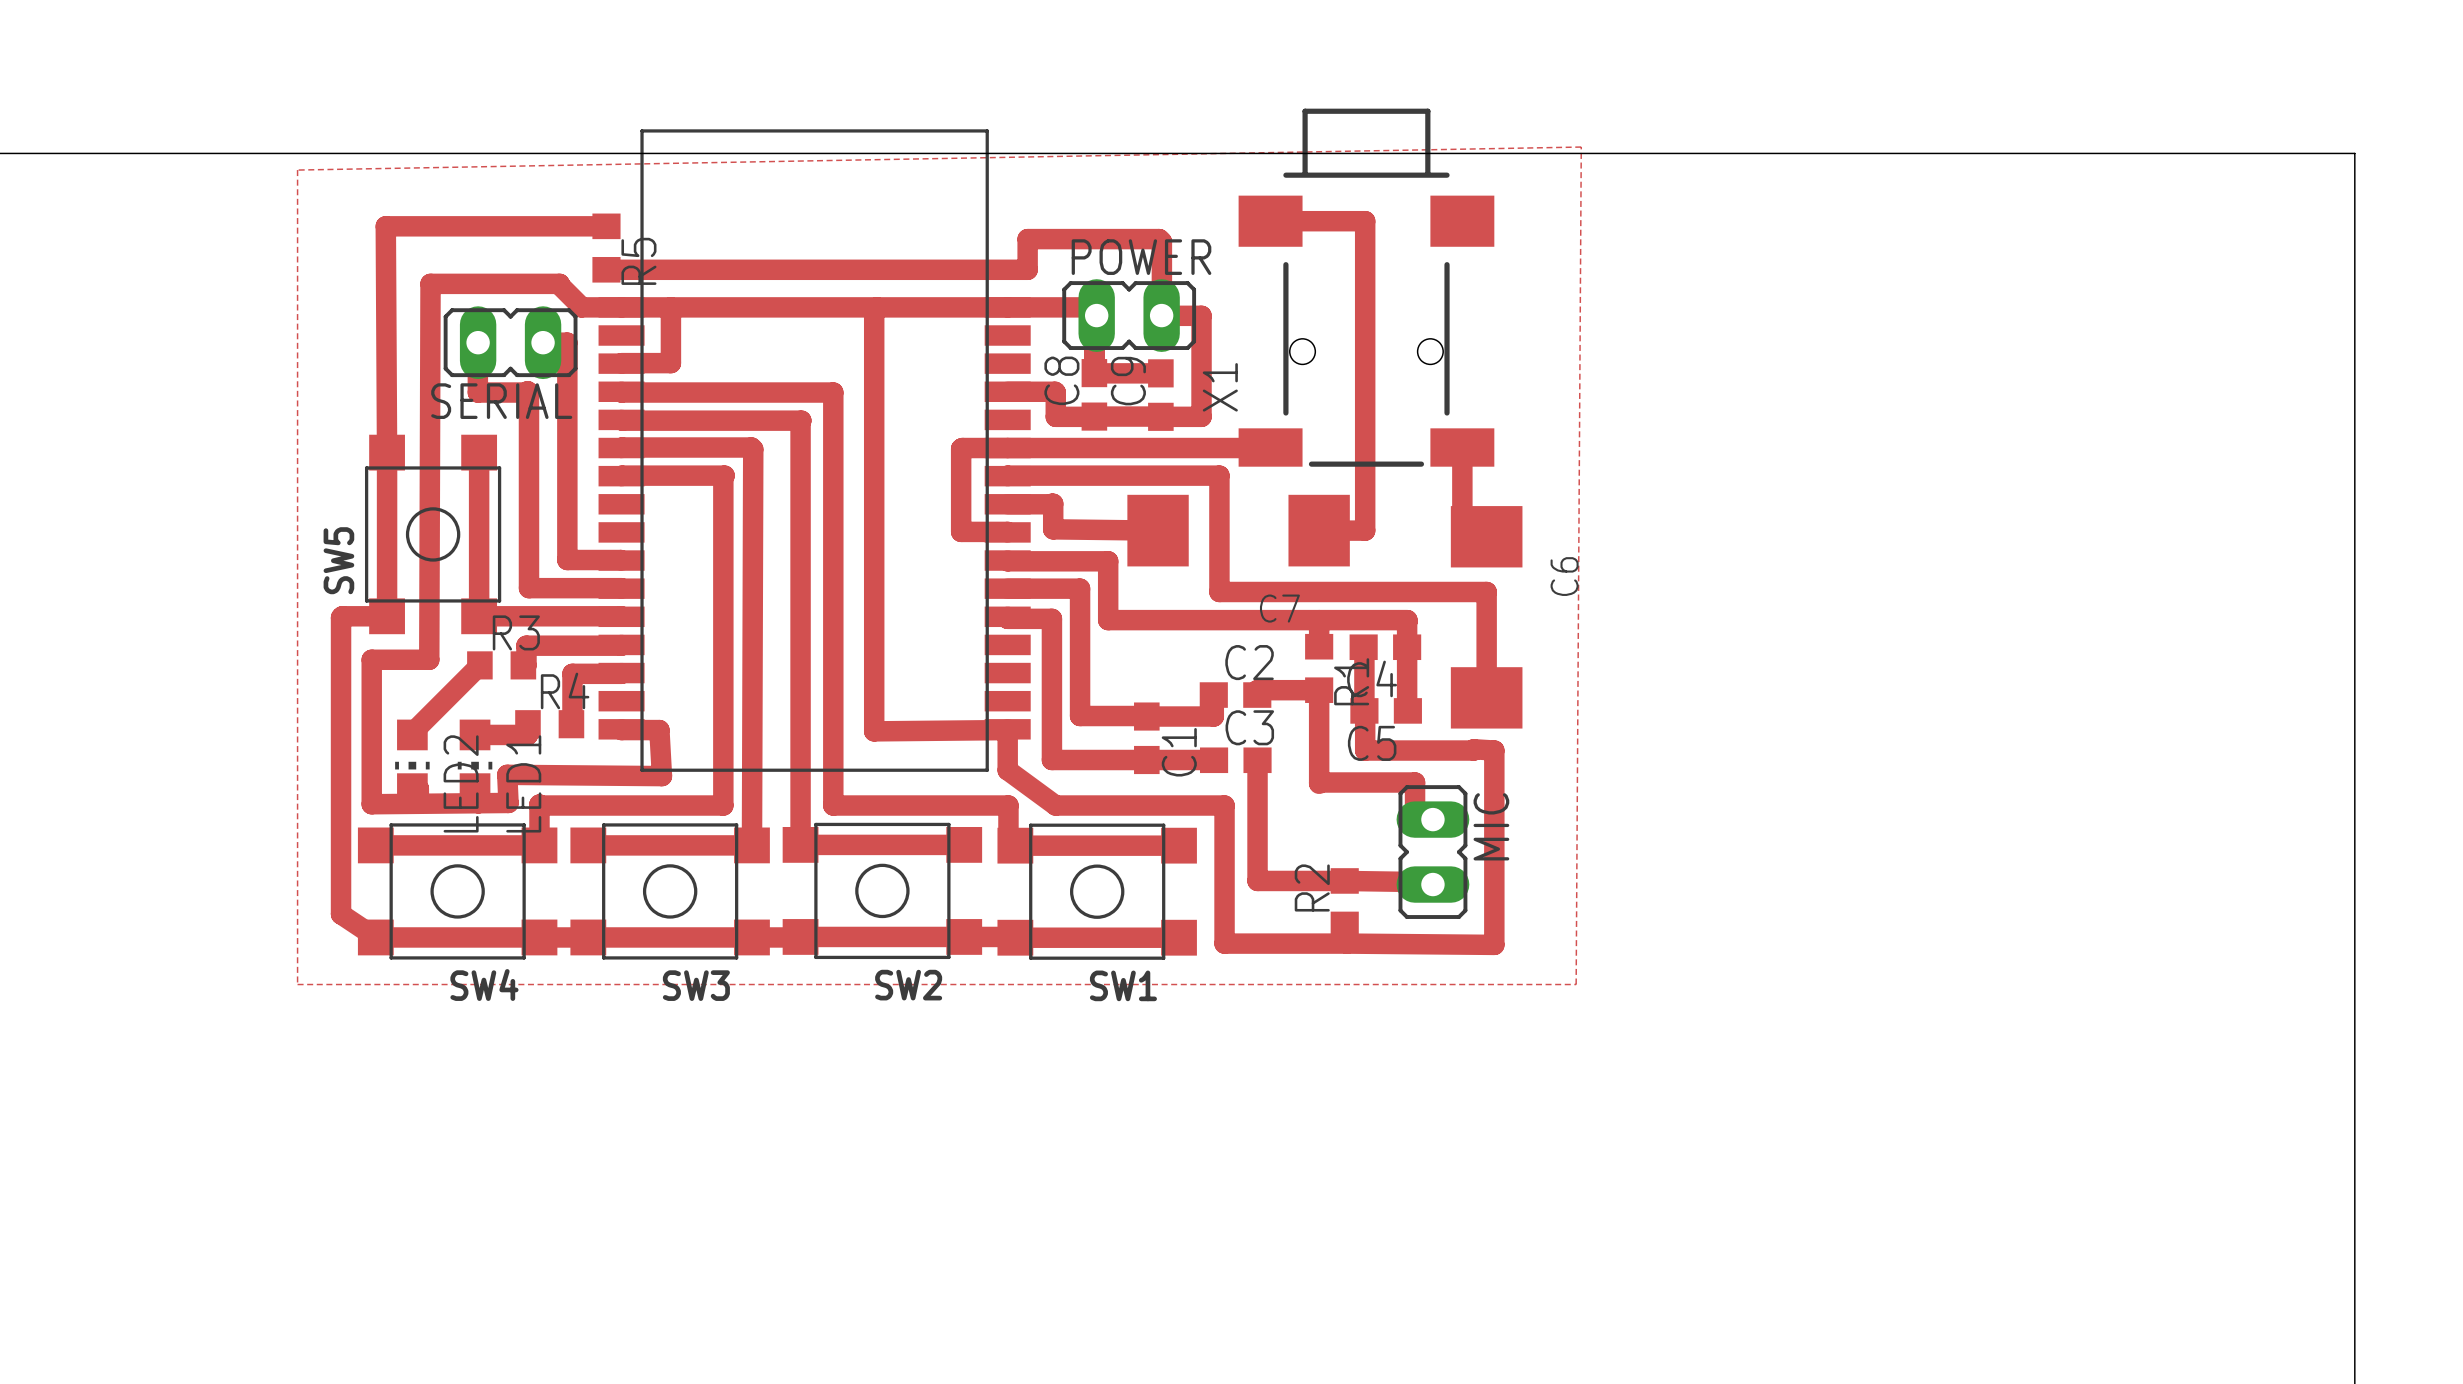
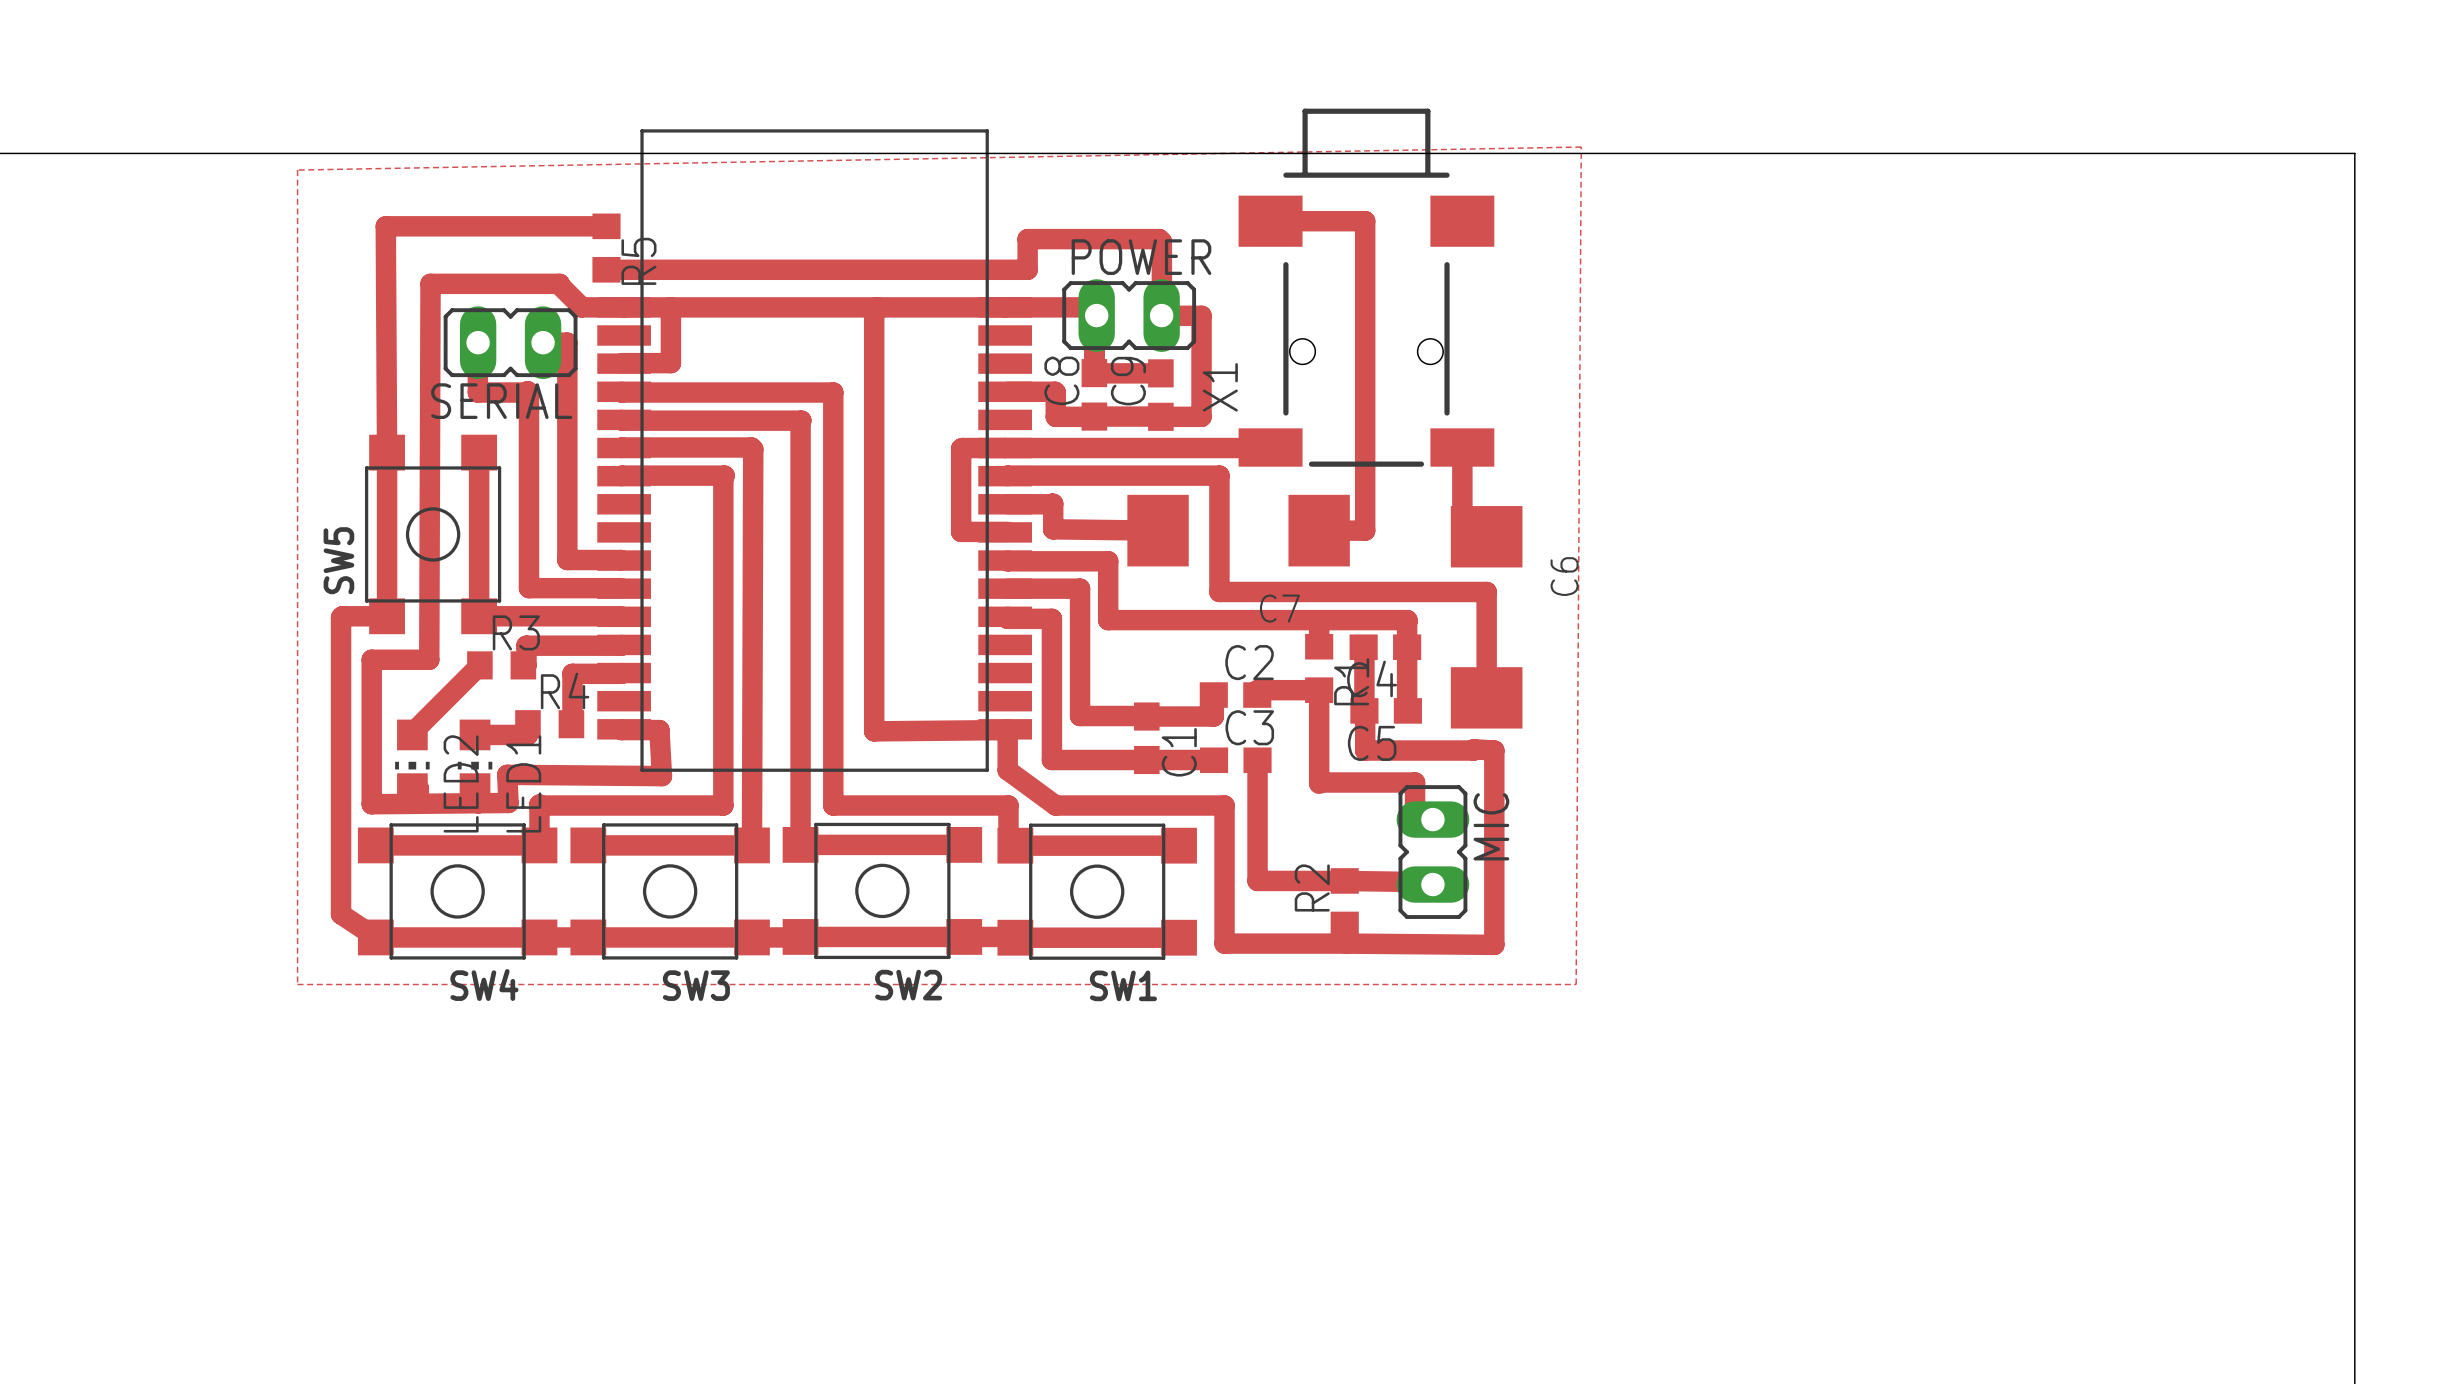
part footprint: [598, 129, 1031, 772] -> [597, 129, 1032, 772]

